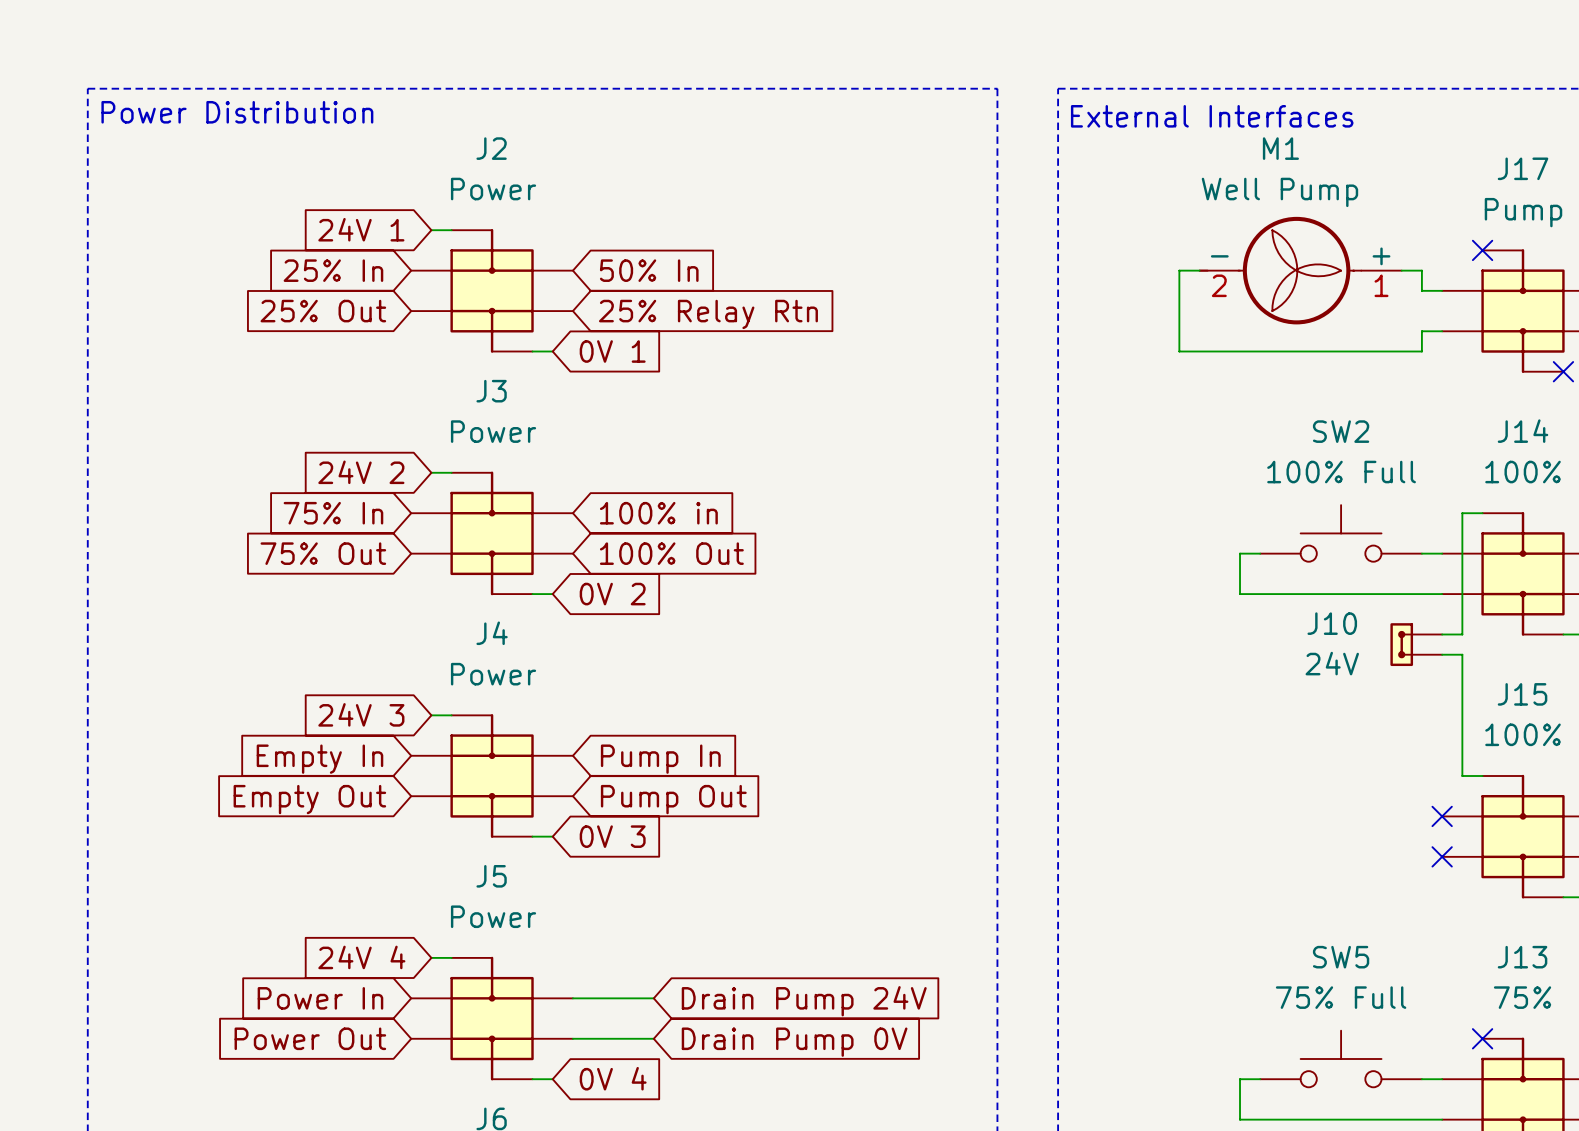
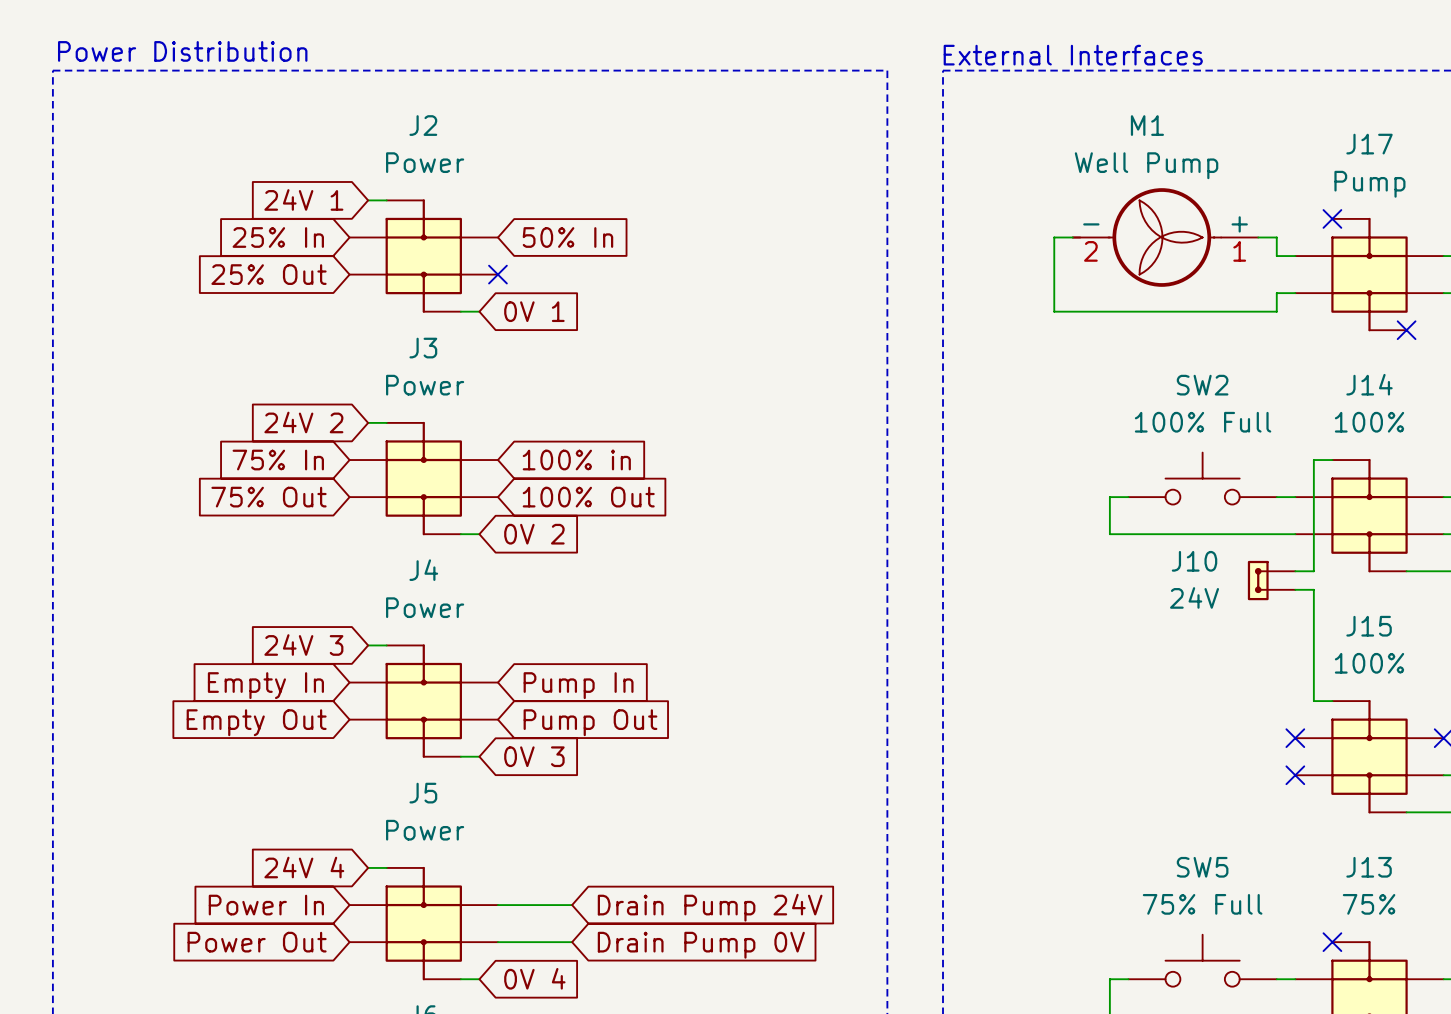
text position: Power Distribution (237, 112) -> Power Distribution (182, 51)
text position: External Interfaces (1212, 116) -> External Interfaces (1073, 55)
no-connect mark: none -> (497, 274)
global label: 25% Relay Rtn (708, 314) -> none

